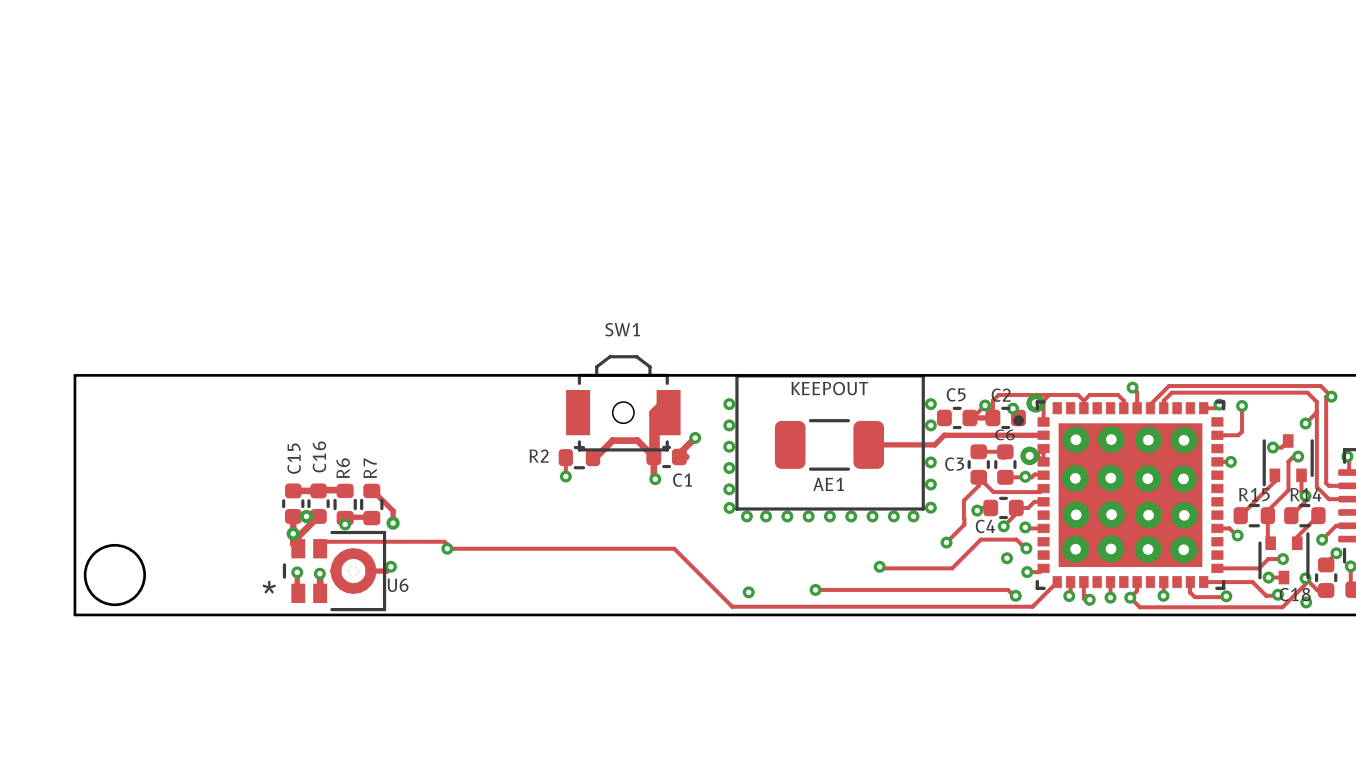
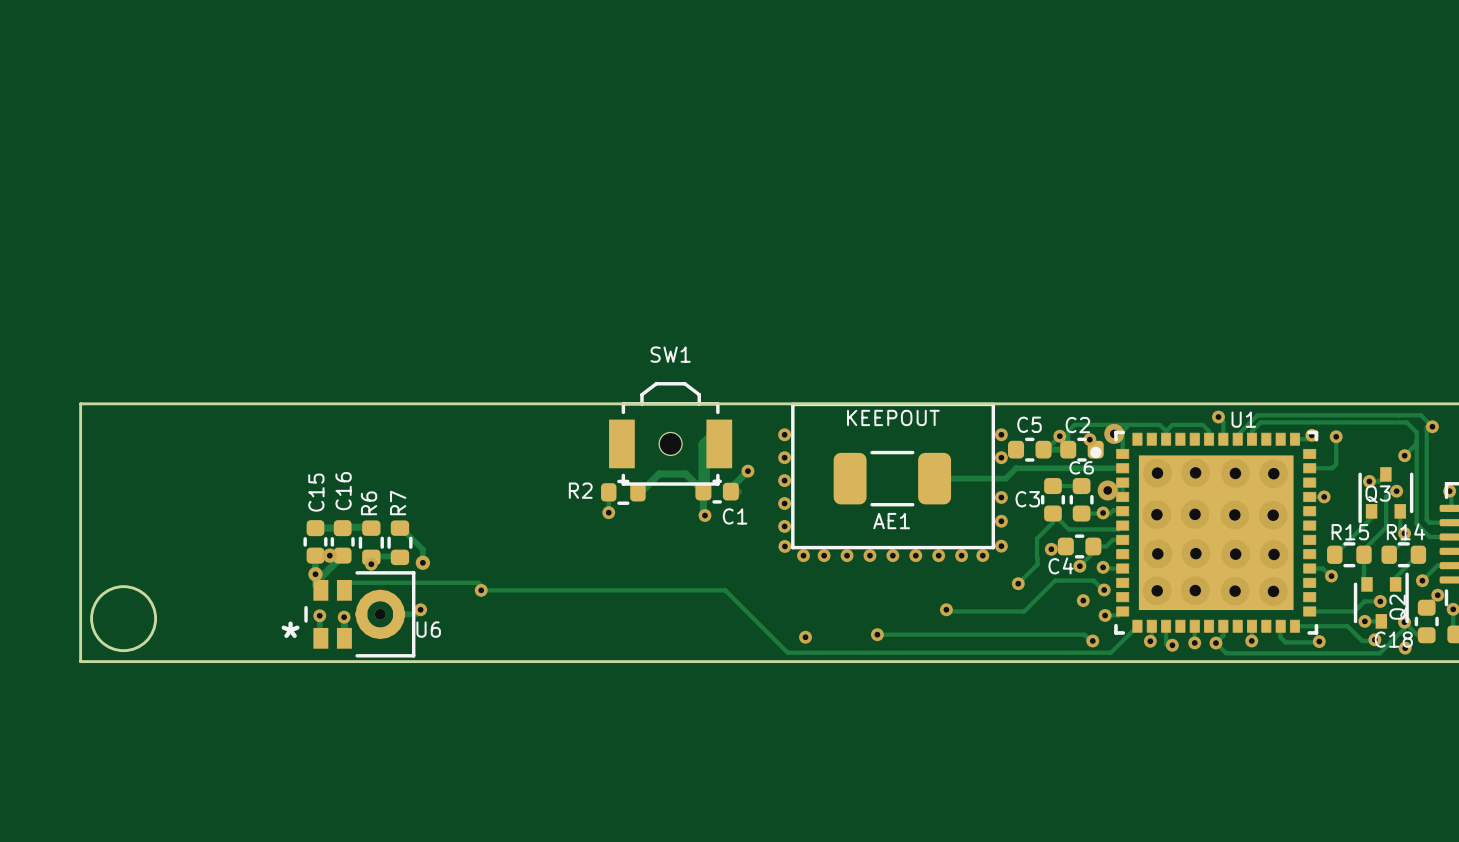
U1 name: none -> U1 (1243, 419)
Q3 name: none -> Q3 (1378, 494)
Q2 name: none -> Q2 (1398, 607)

